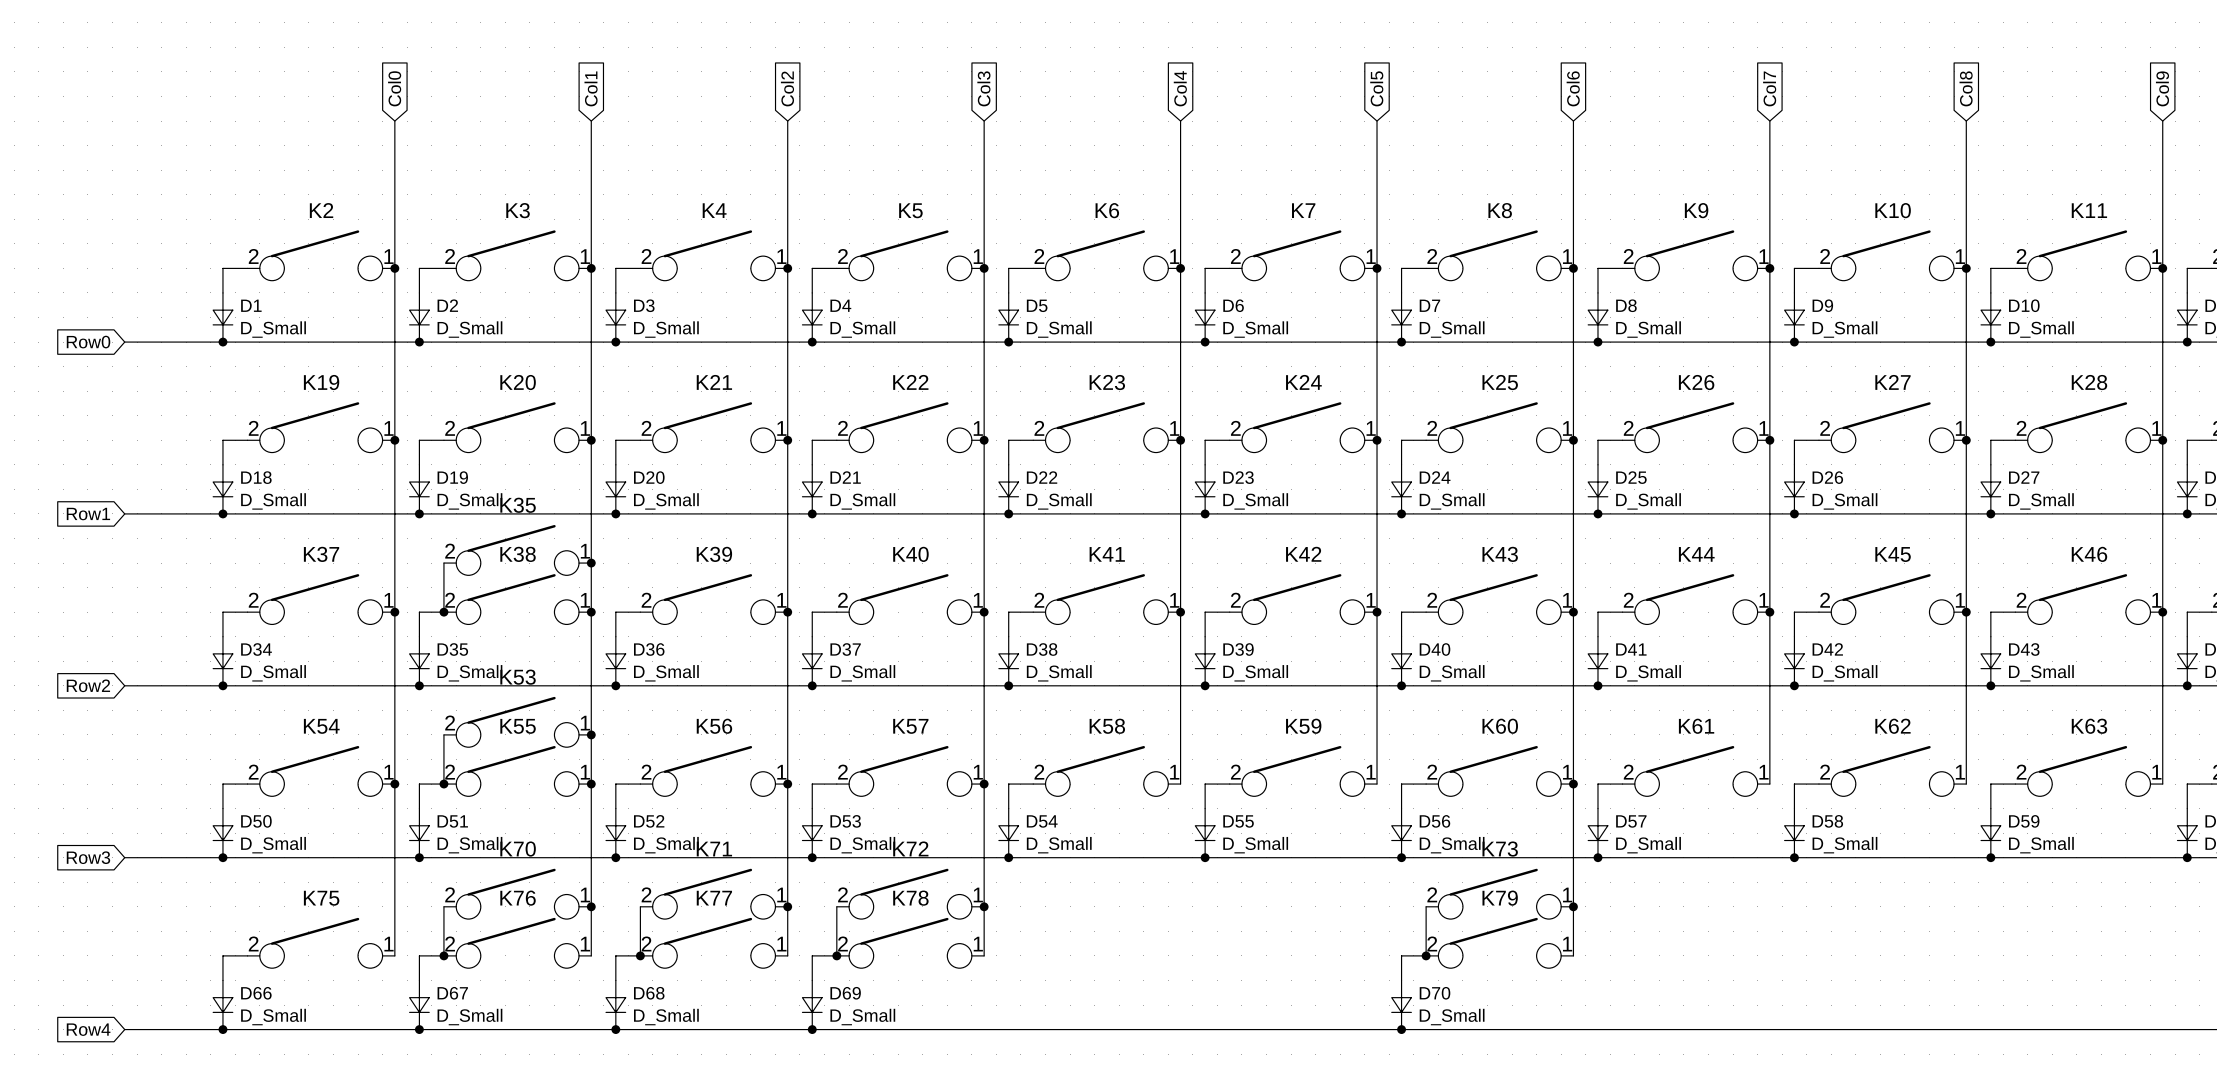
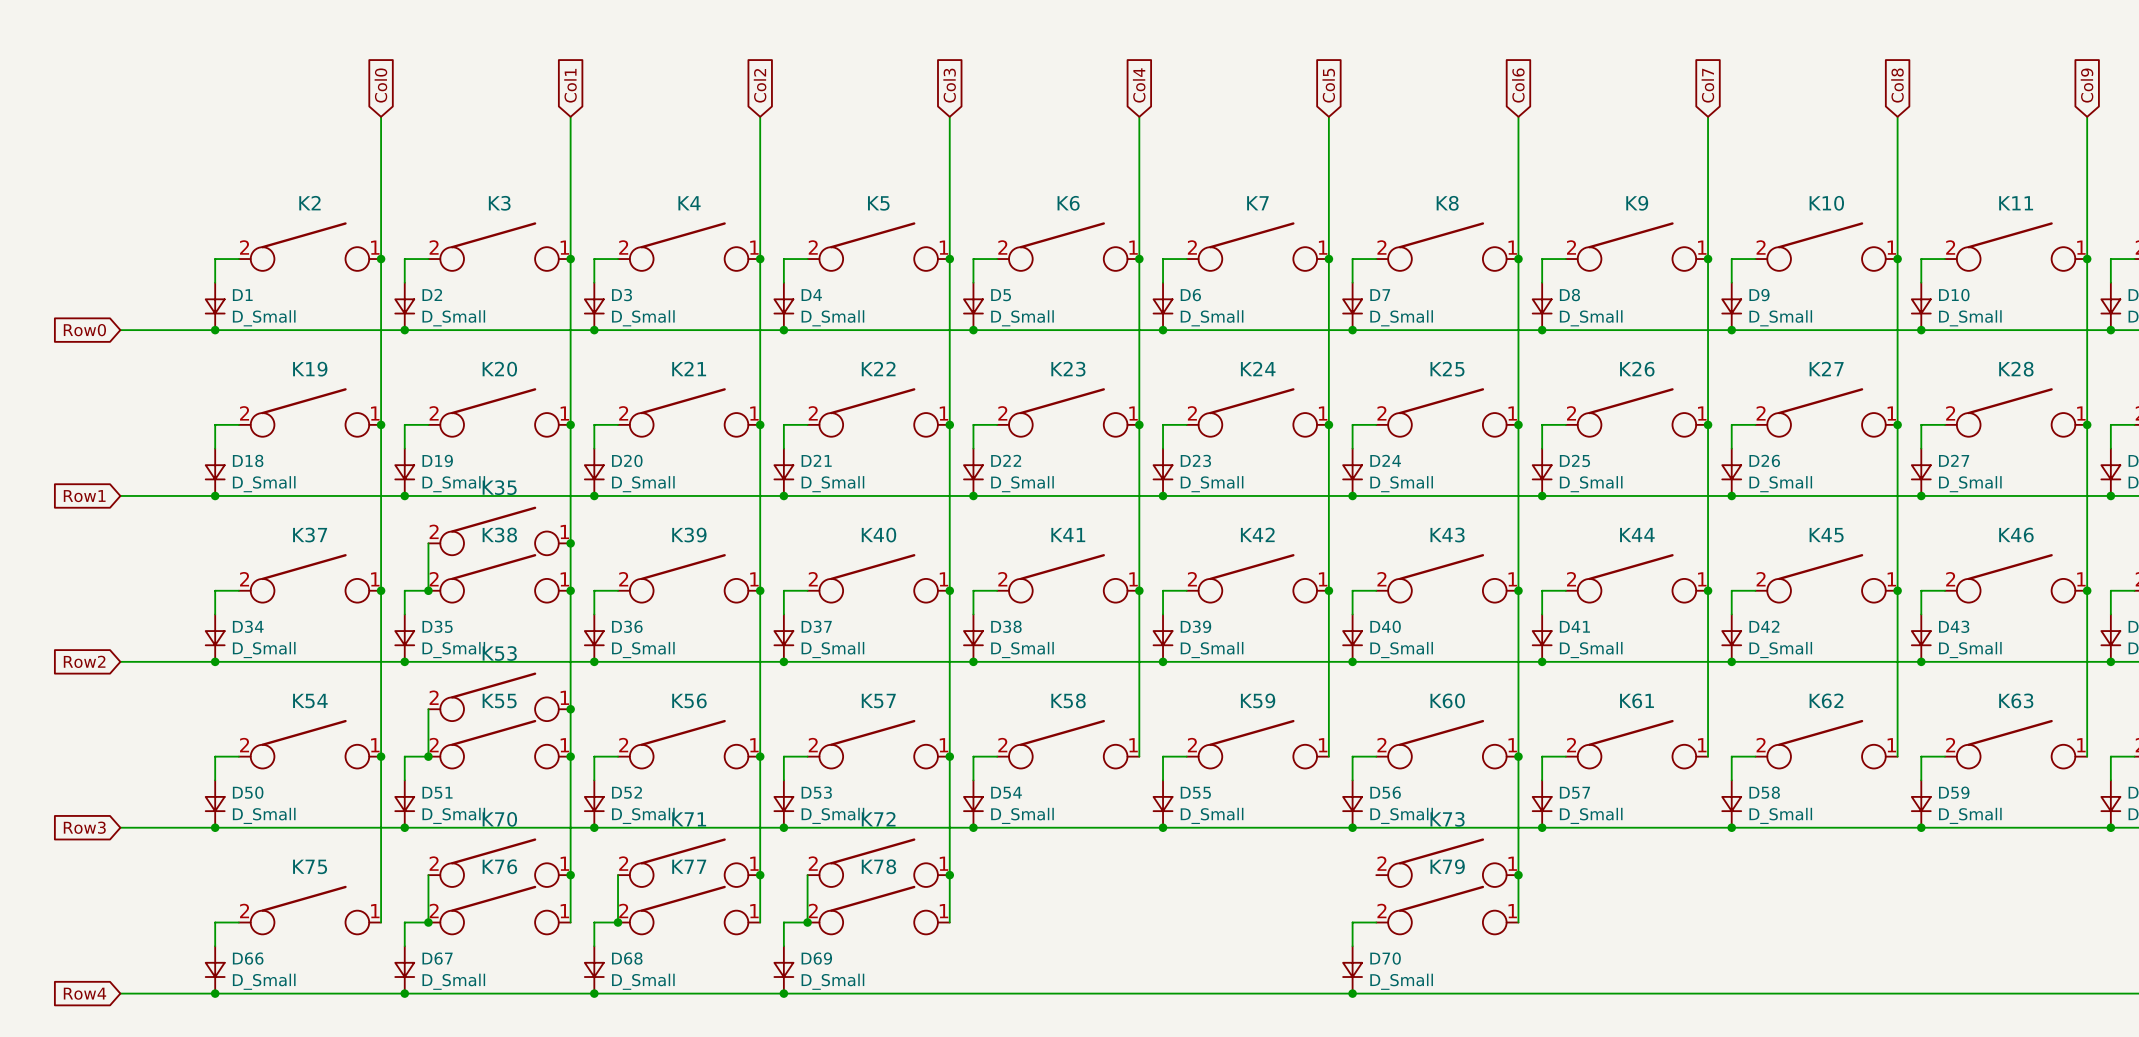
wire: (1426, 906) (1426, 955) -> none
junction: (1426, 955) -> none

